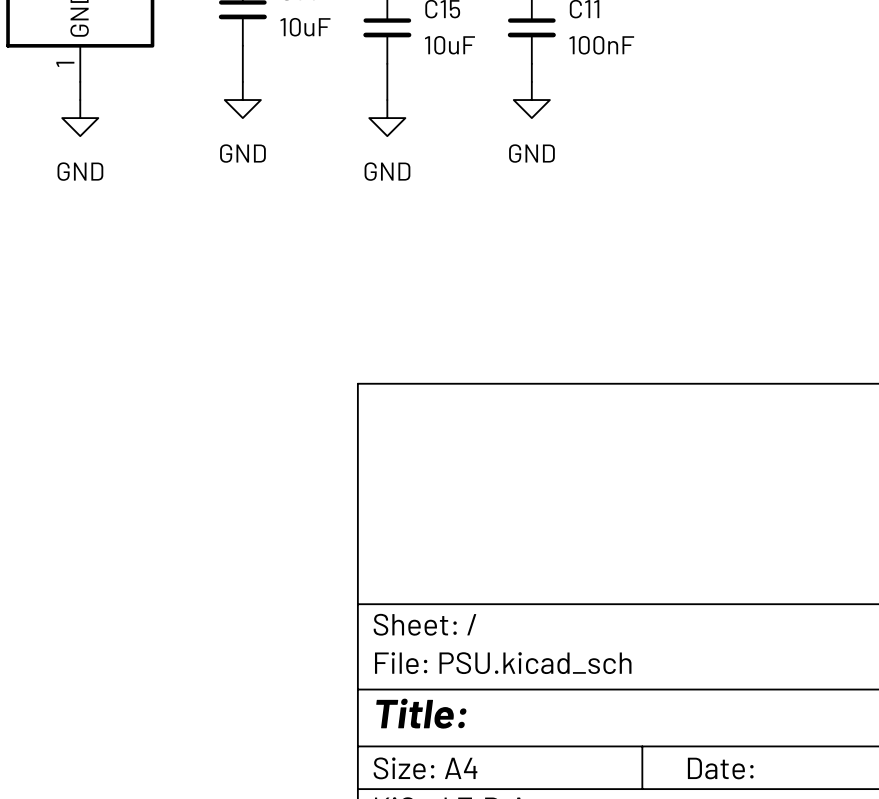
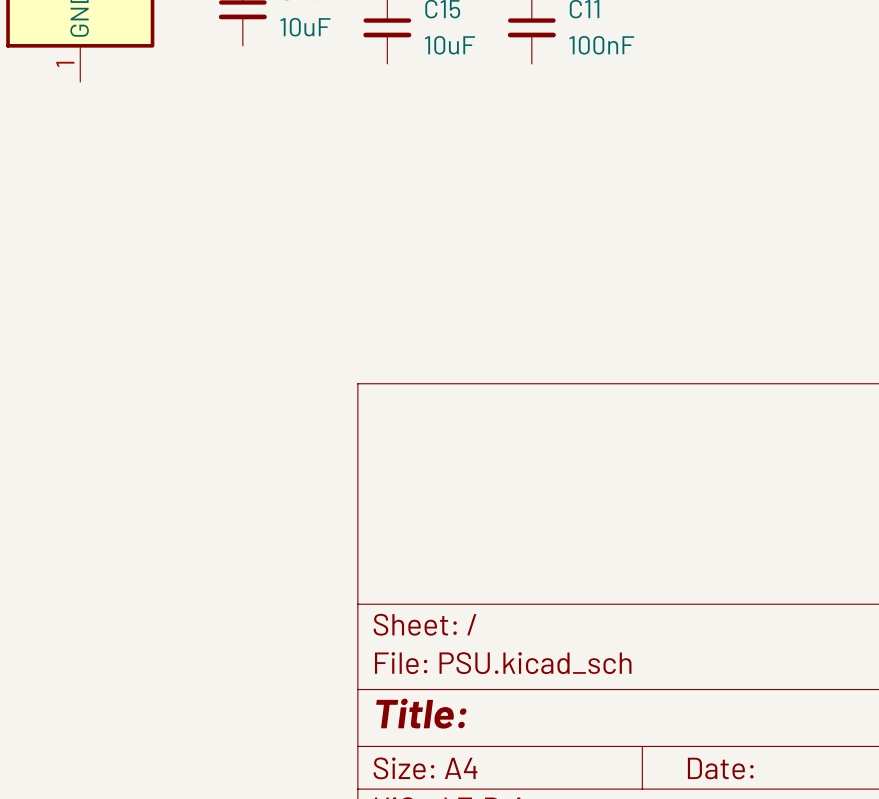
wire: (242, 45) (242, 81) -> none
wire: (387, 63) (387, 100) -> none
wire: (531, 63) (531, 81) -> none
wire: (80, 81) (80, 100) -> none
power symbol: GND (242, 100) -> none
power symbol: GND (531, 100) -> none
power symbol: GND (80, 118) -> none
power symbol: GND (387, 118) -> none

